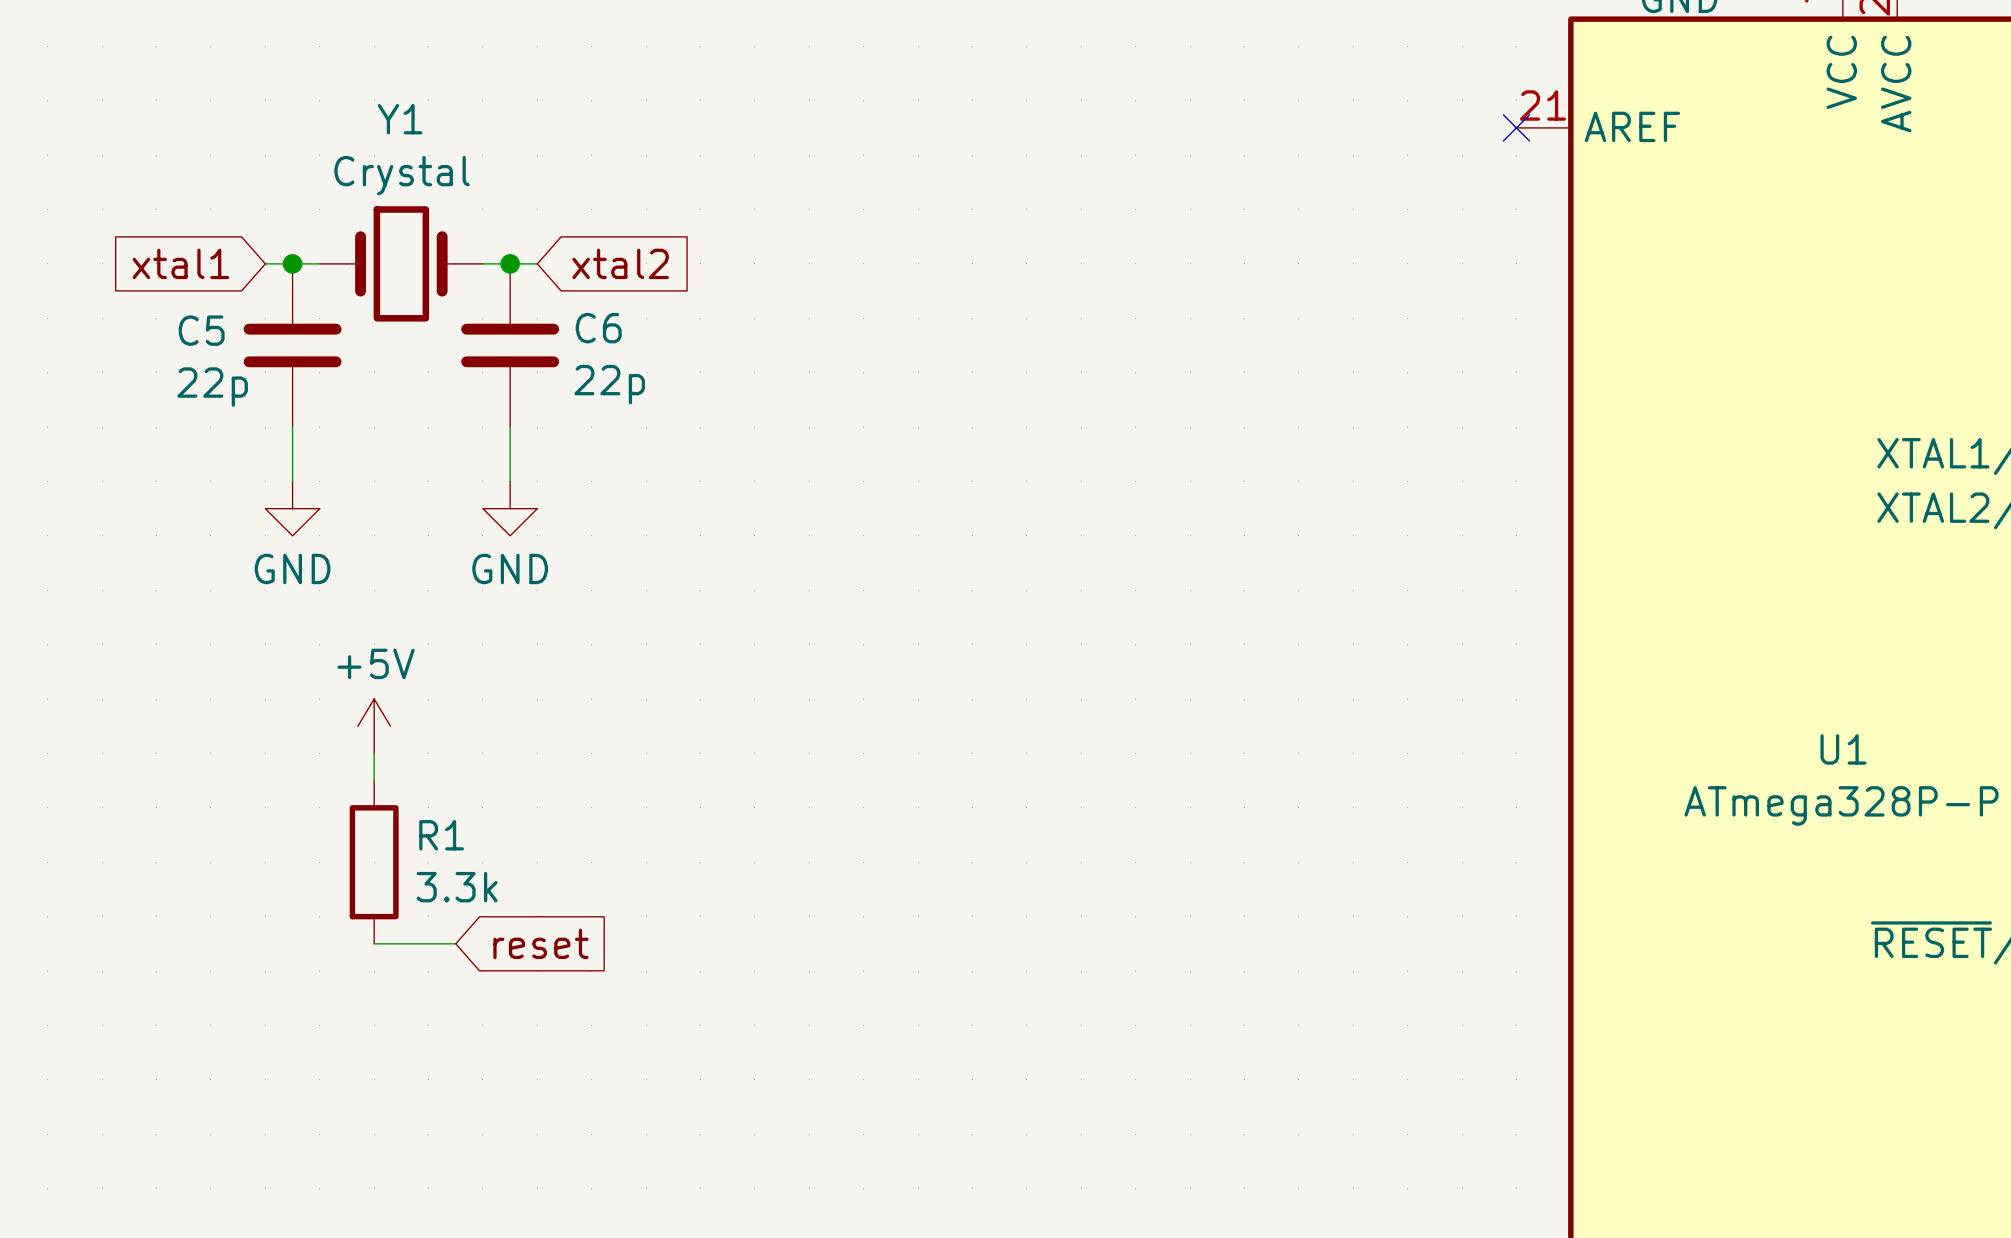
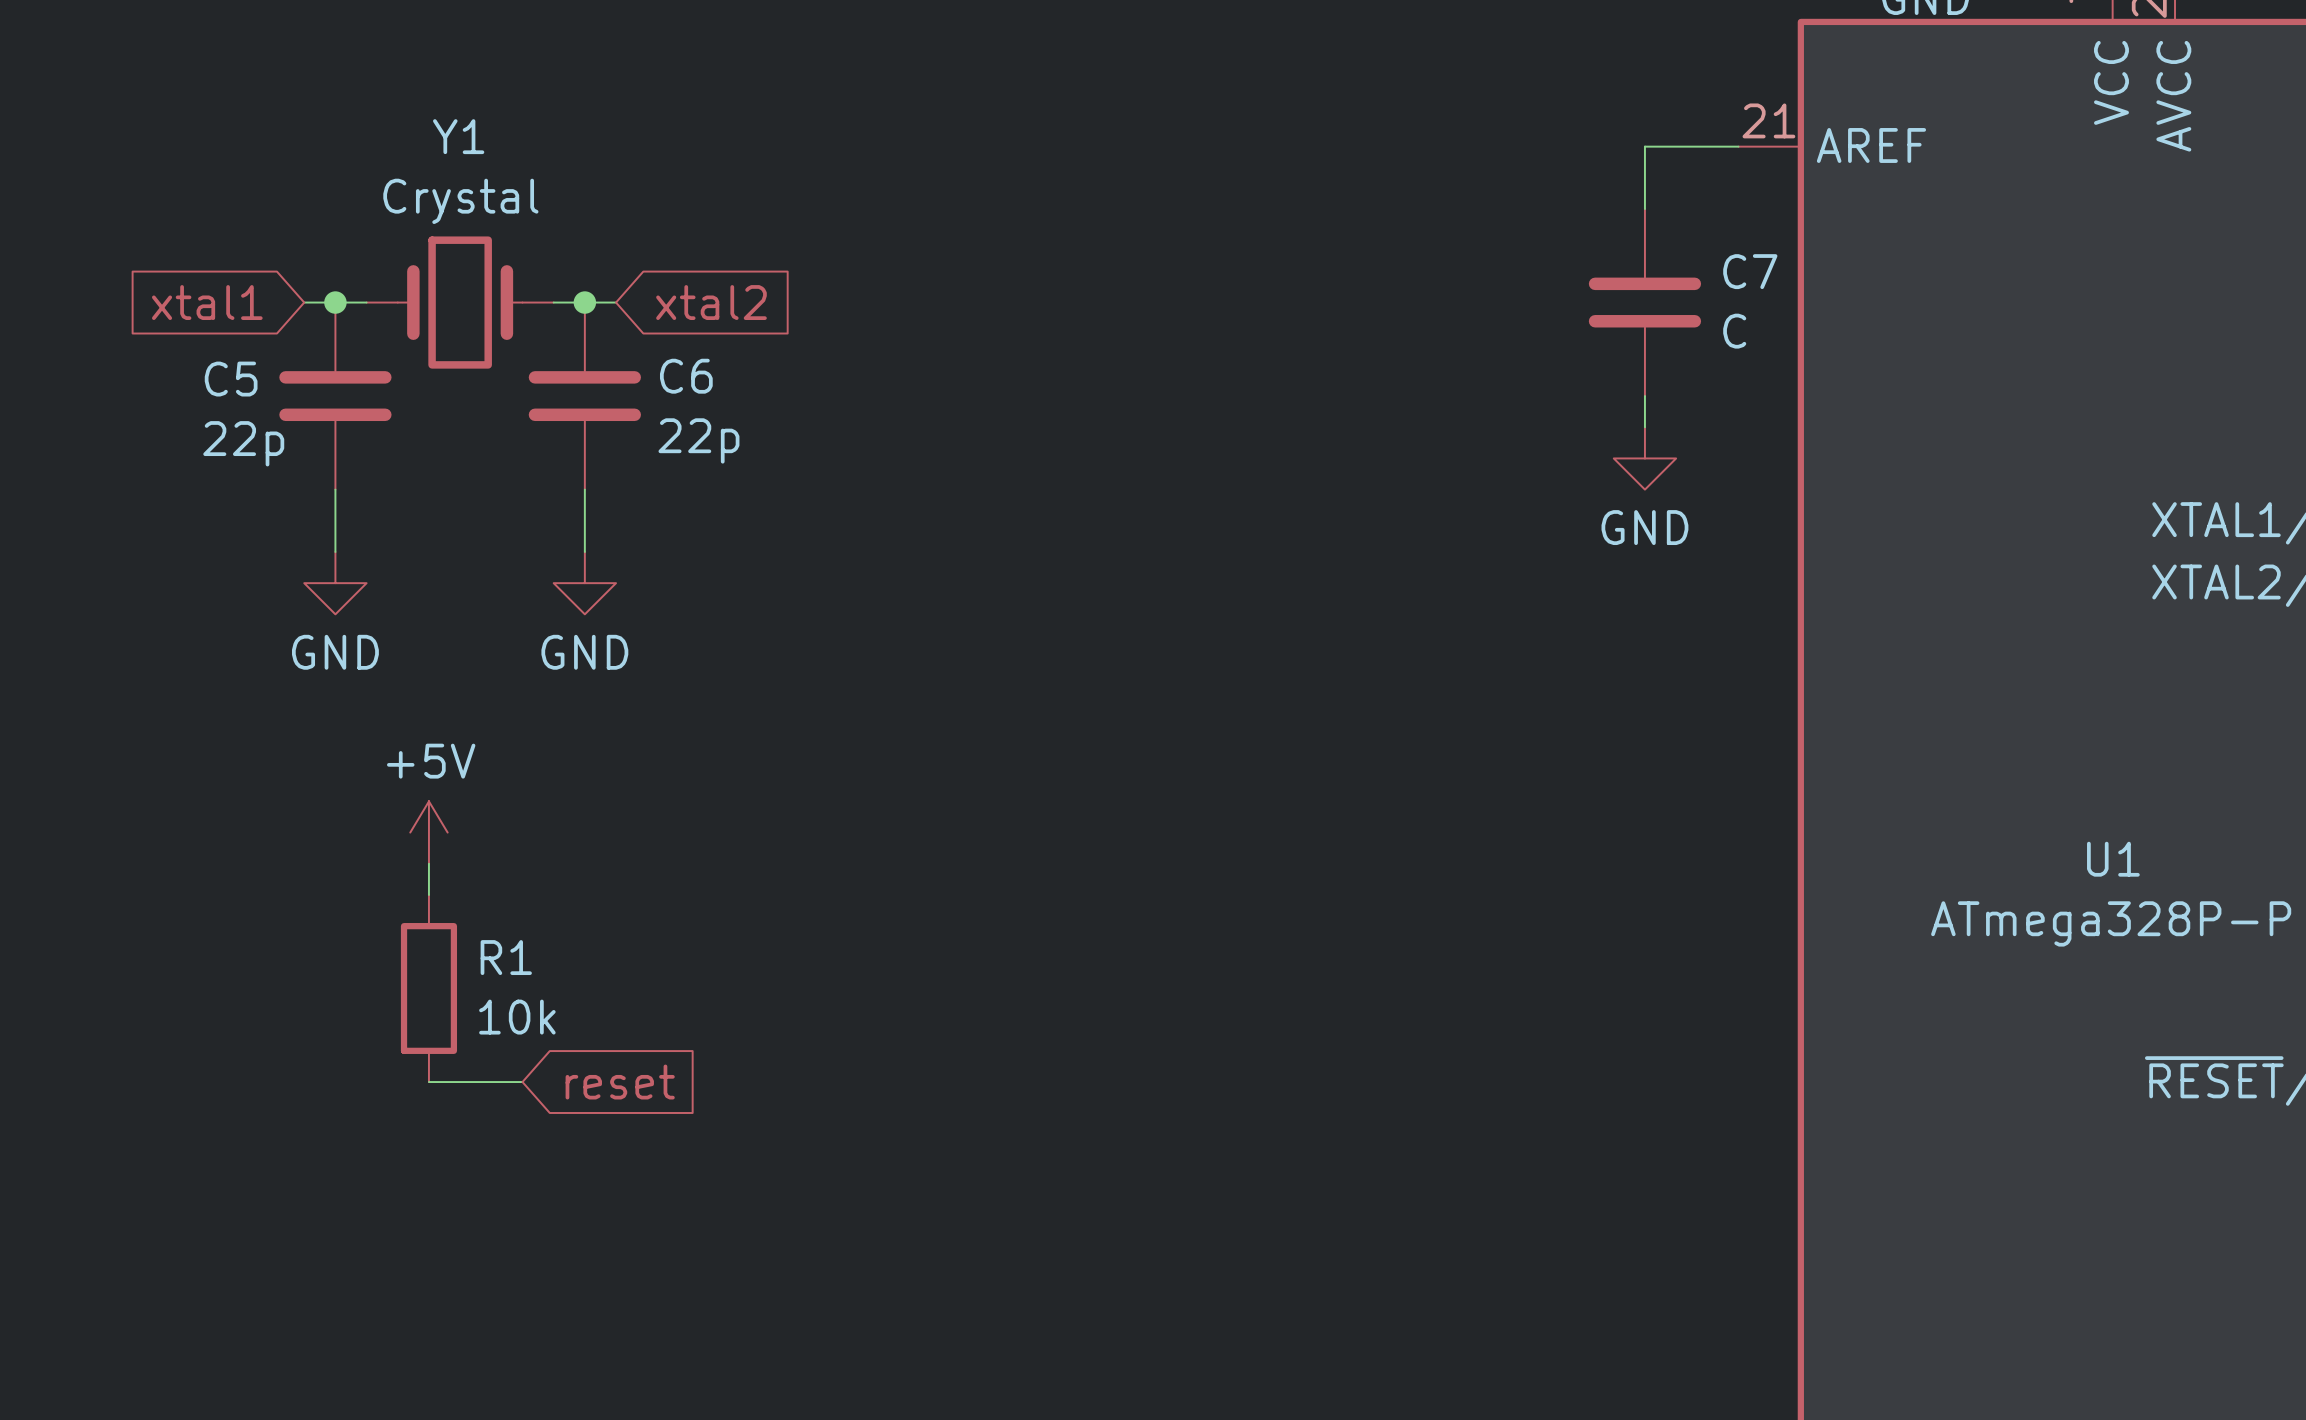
wire: none -> (1738, 146) (1644, 146) (1644, 209)
no-connect mark: (1516, 127) -> none
C7: none -> C (1644, 302)
wire: none -> (1644, 396) (1644, 427)
power symbol: none -> GND (1644, 458)
R1 value: 3.3k (457, 887) -> 10k (517, 1017)

